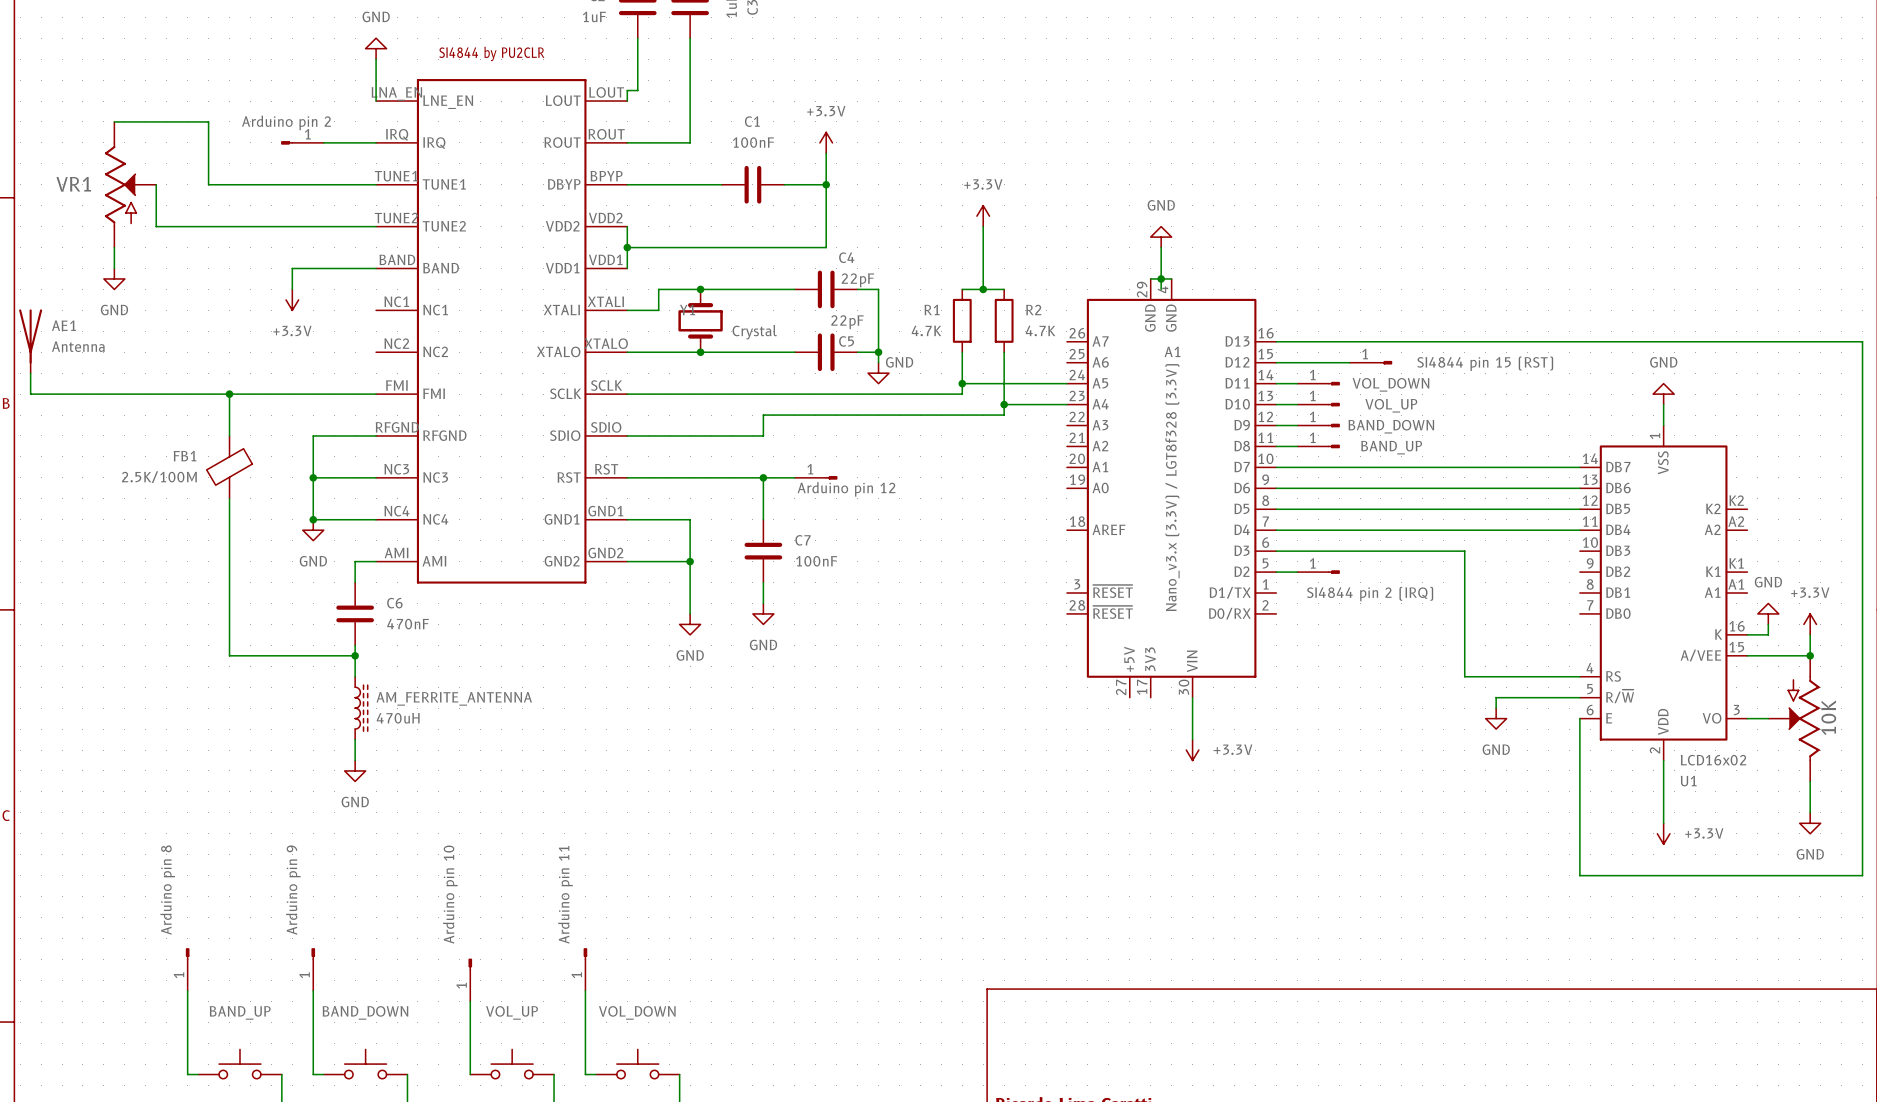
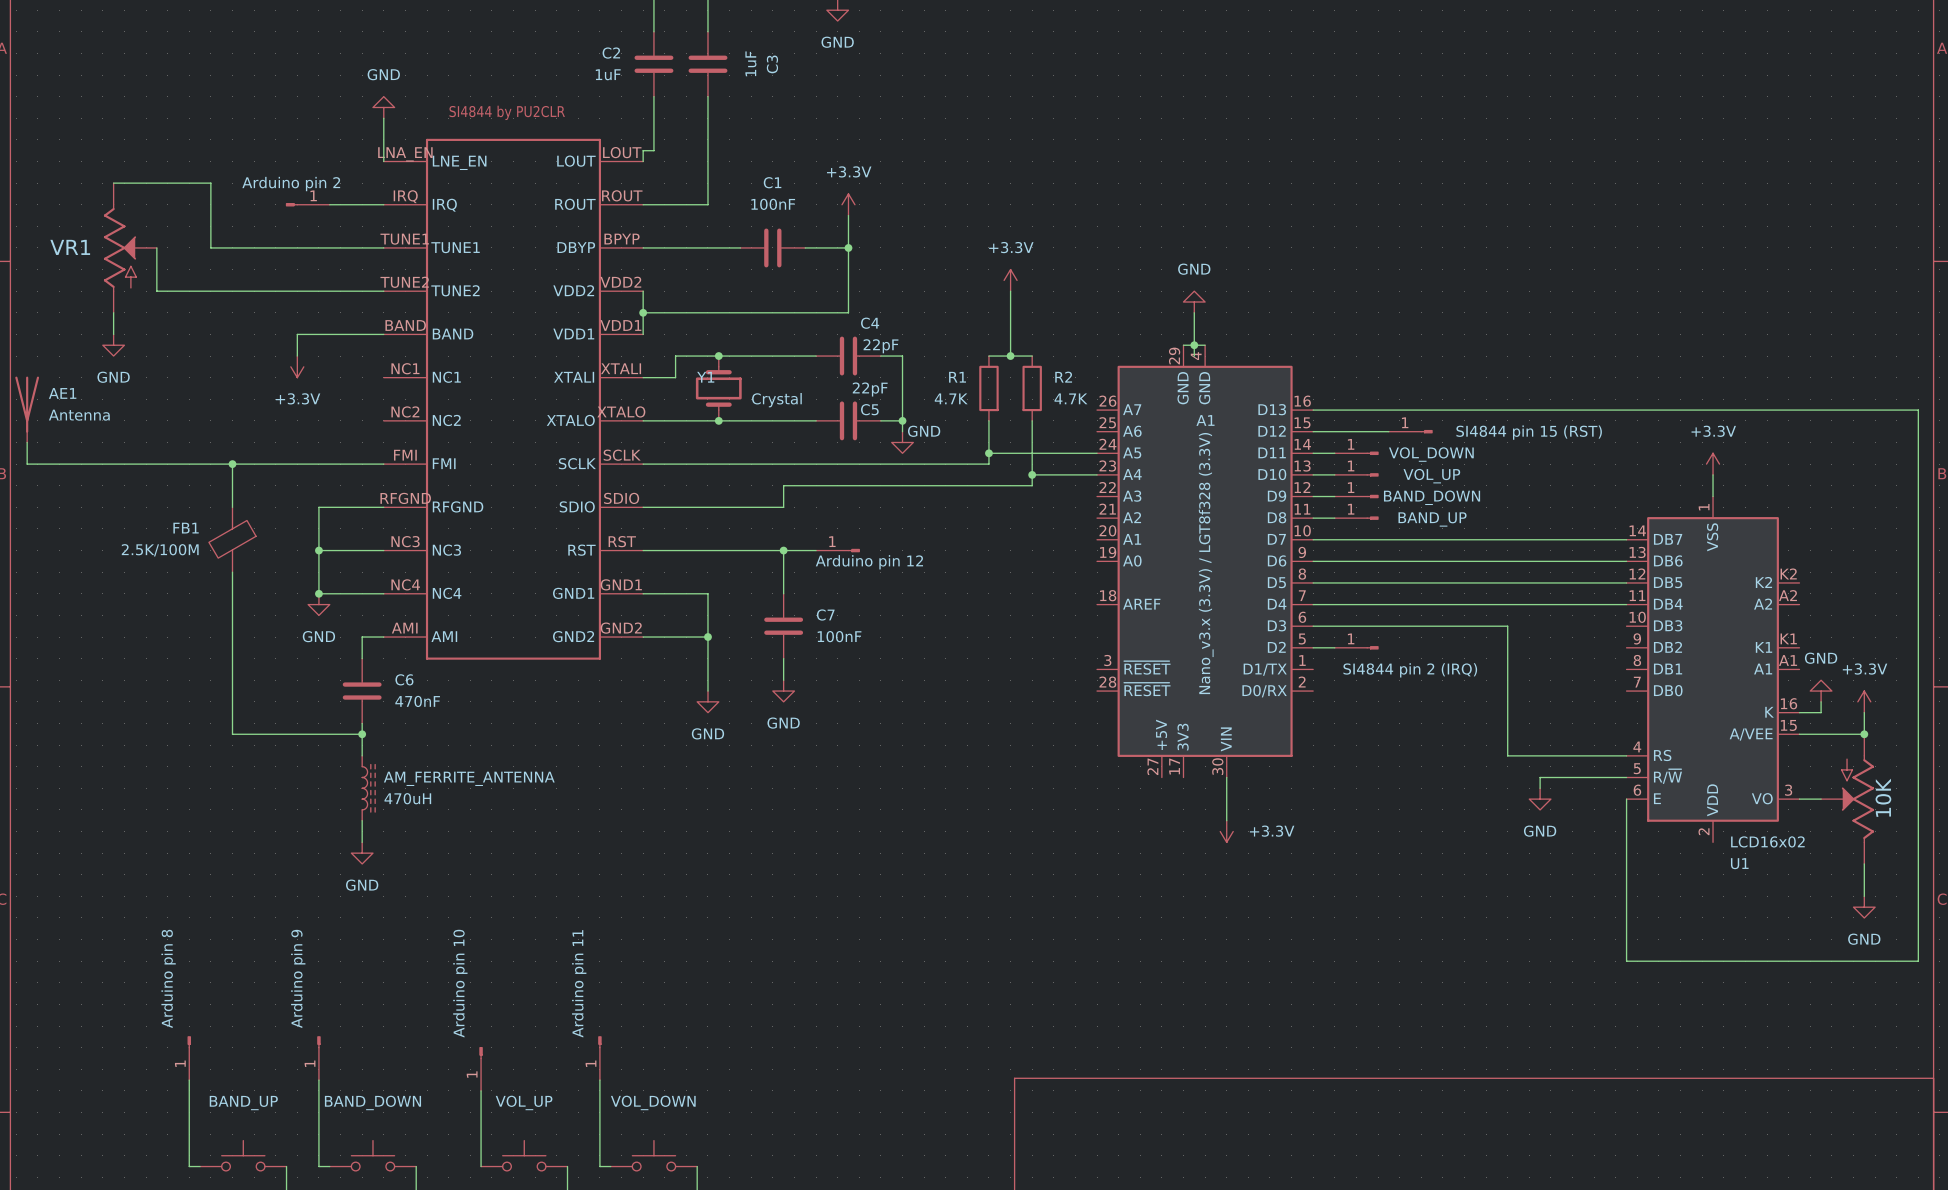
power symbol: GND (1663, 394) -> +3.3V (1713, 464)
wire: (1663, 760) (1663, 823) -> none
power symbol: +3.3V (1663, 833) -> none

